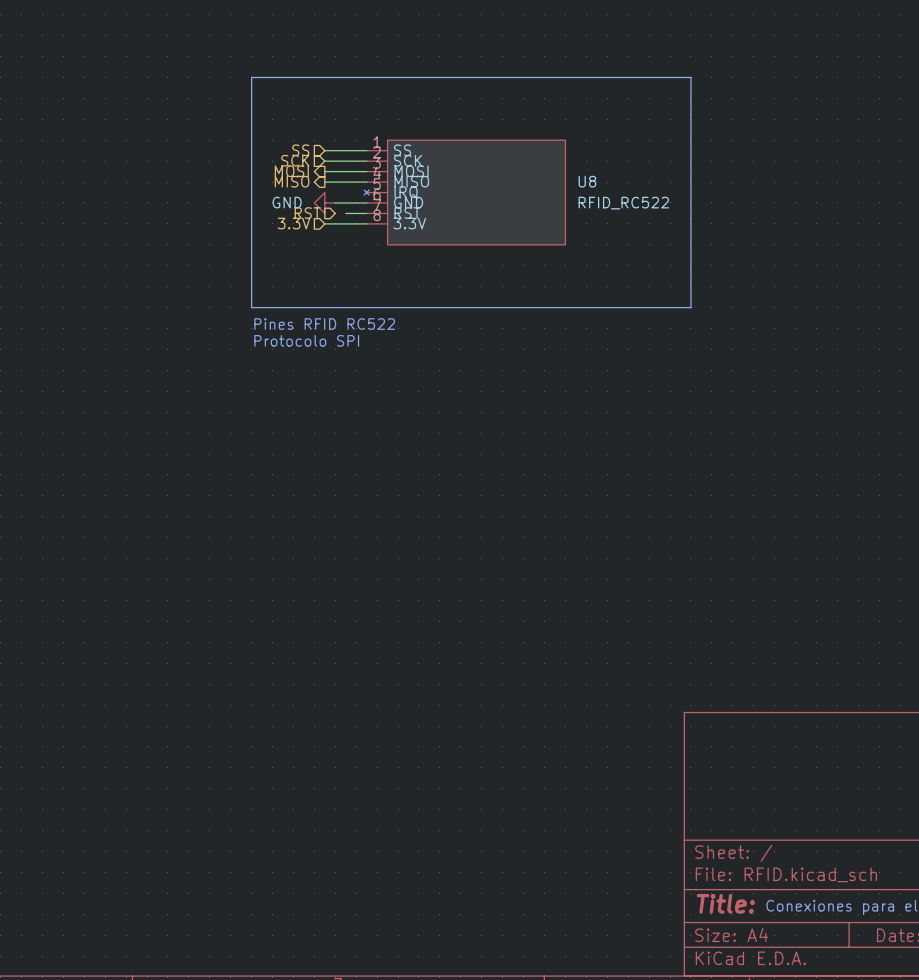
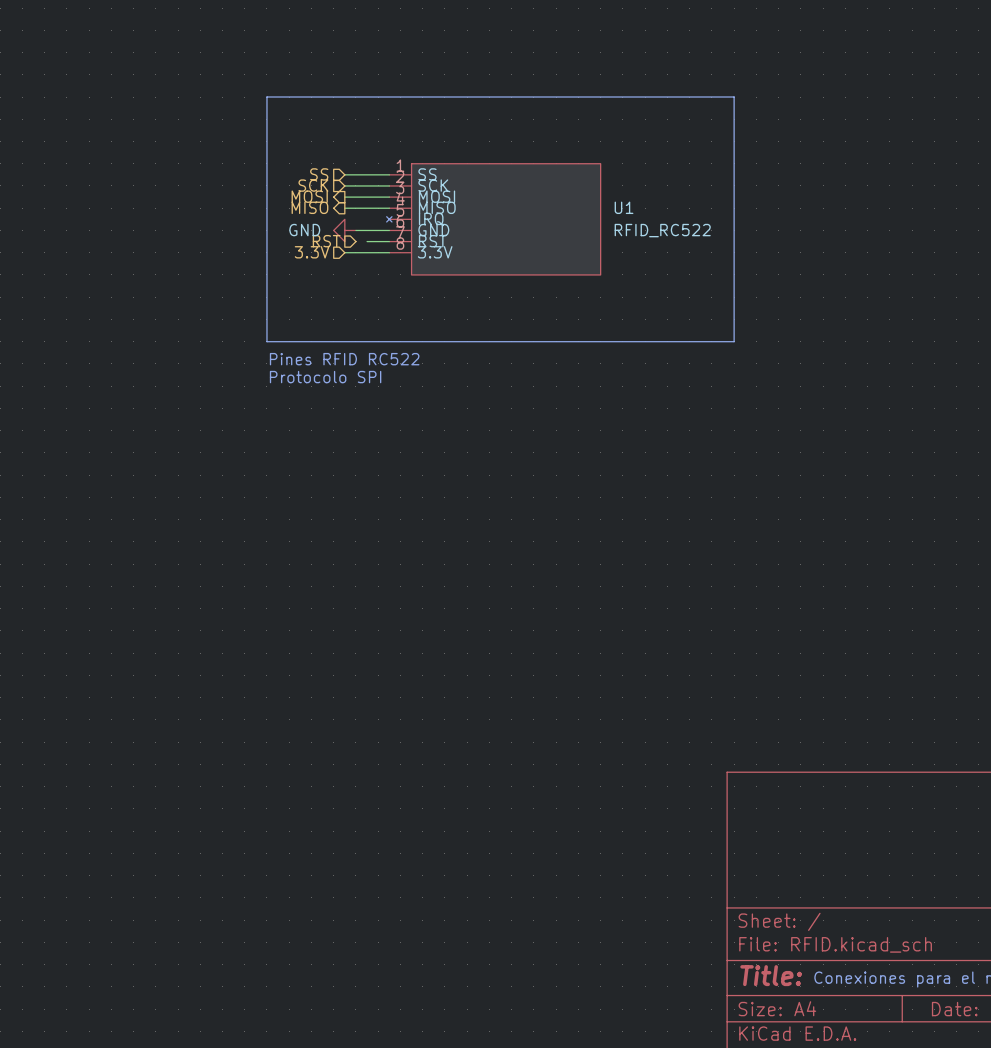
U8 name: U8 (587, 181) -> U1 (624, 207)

